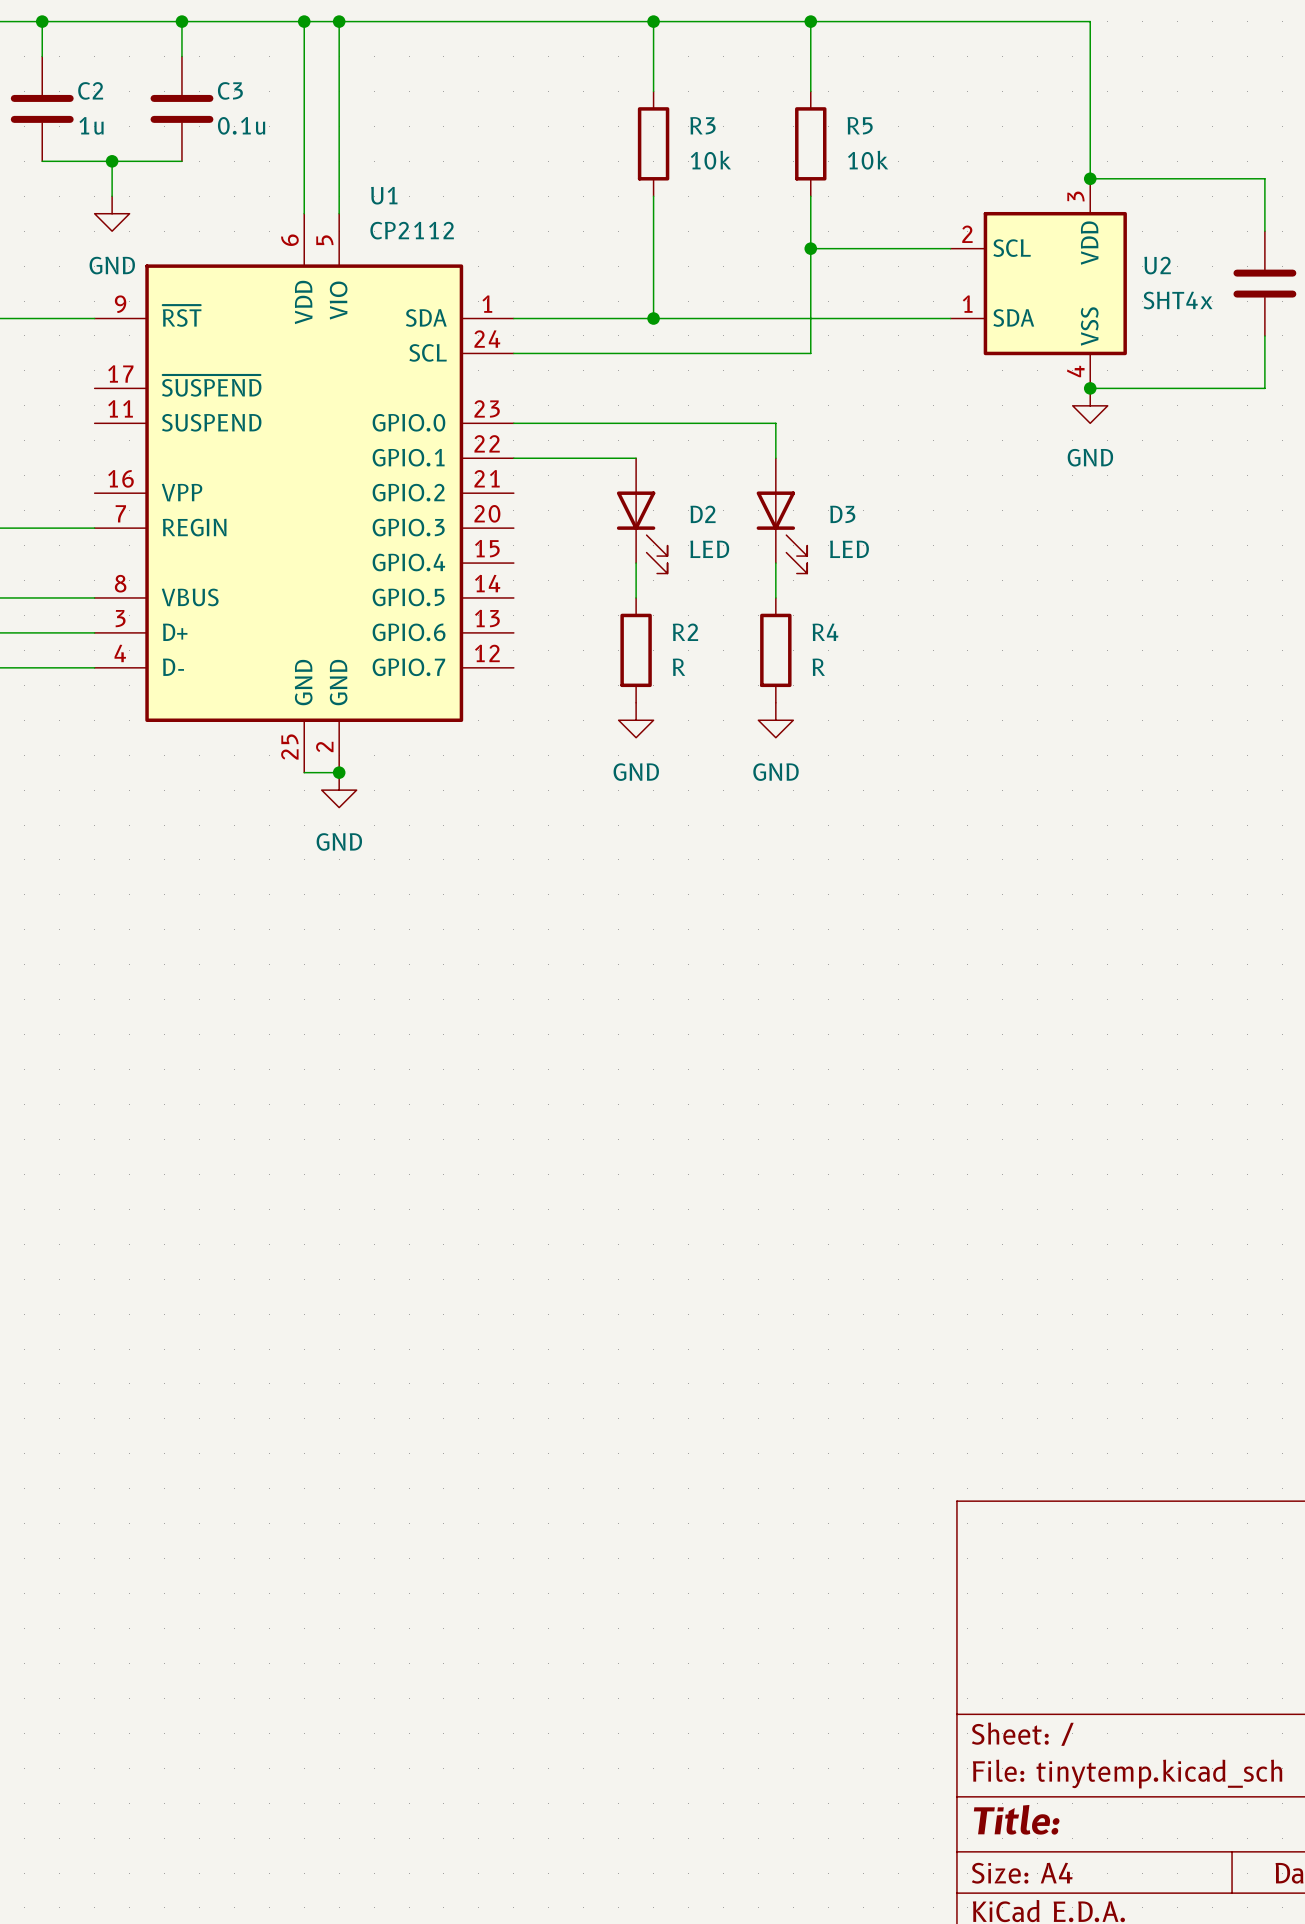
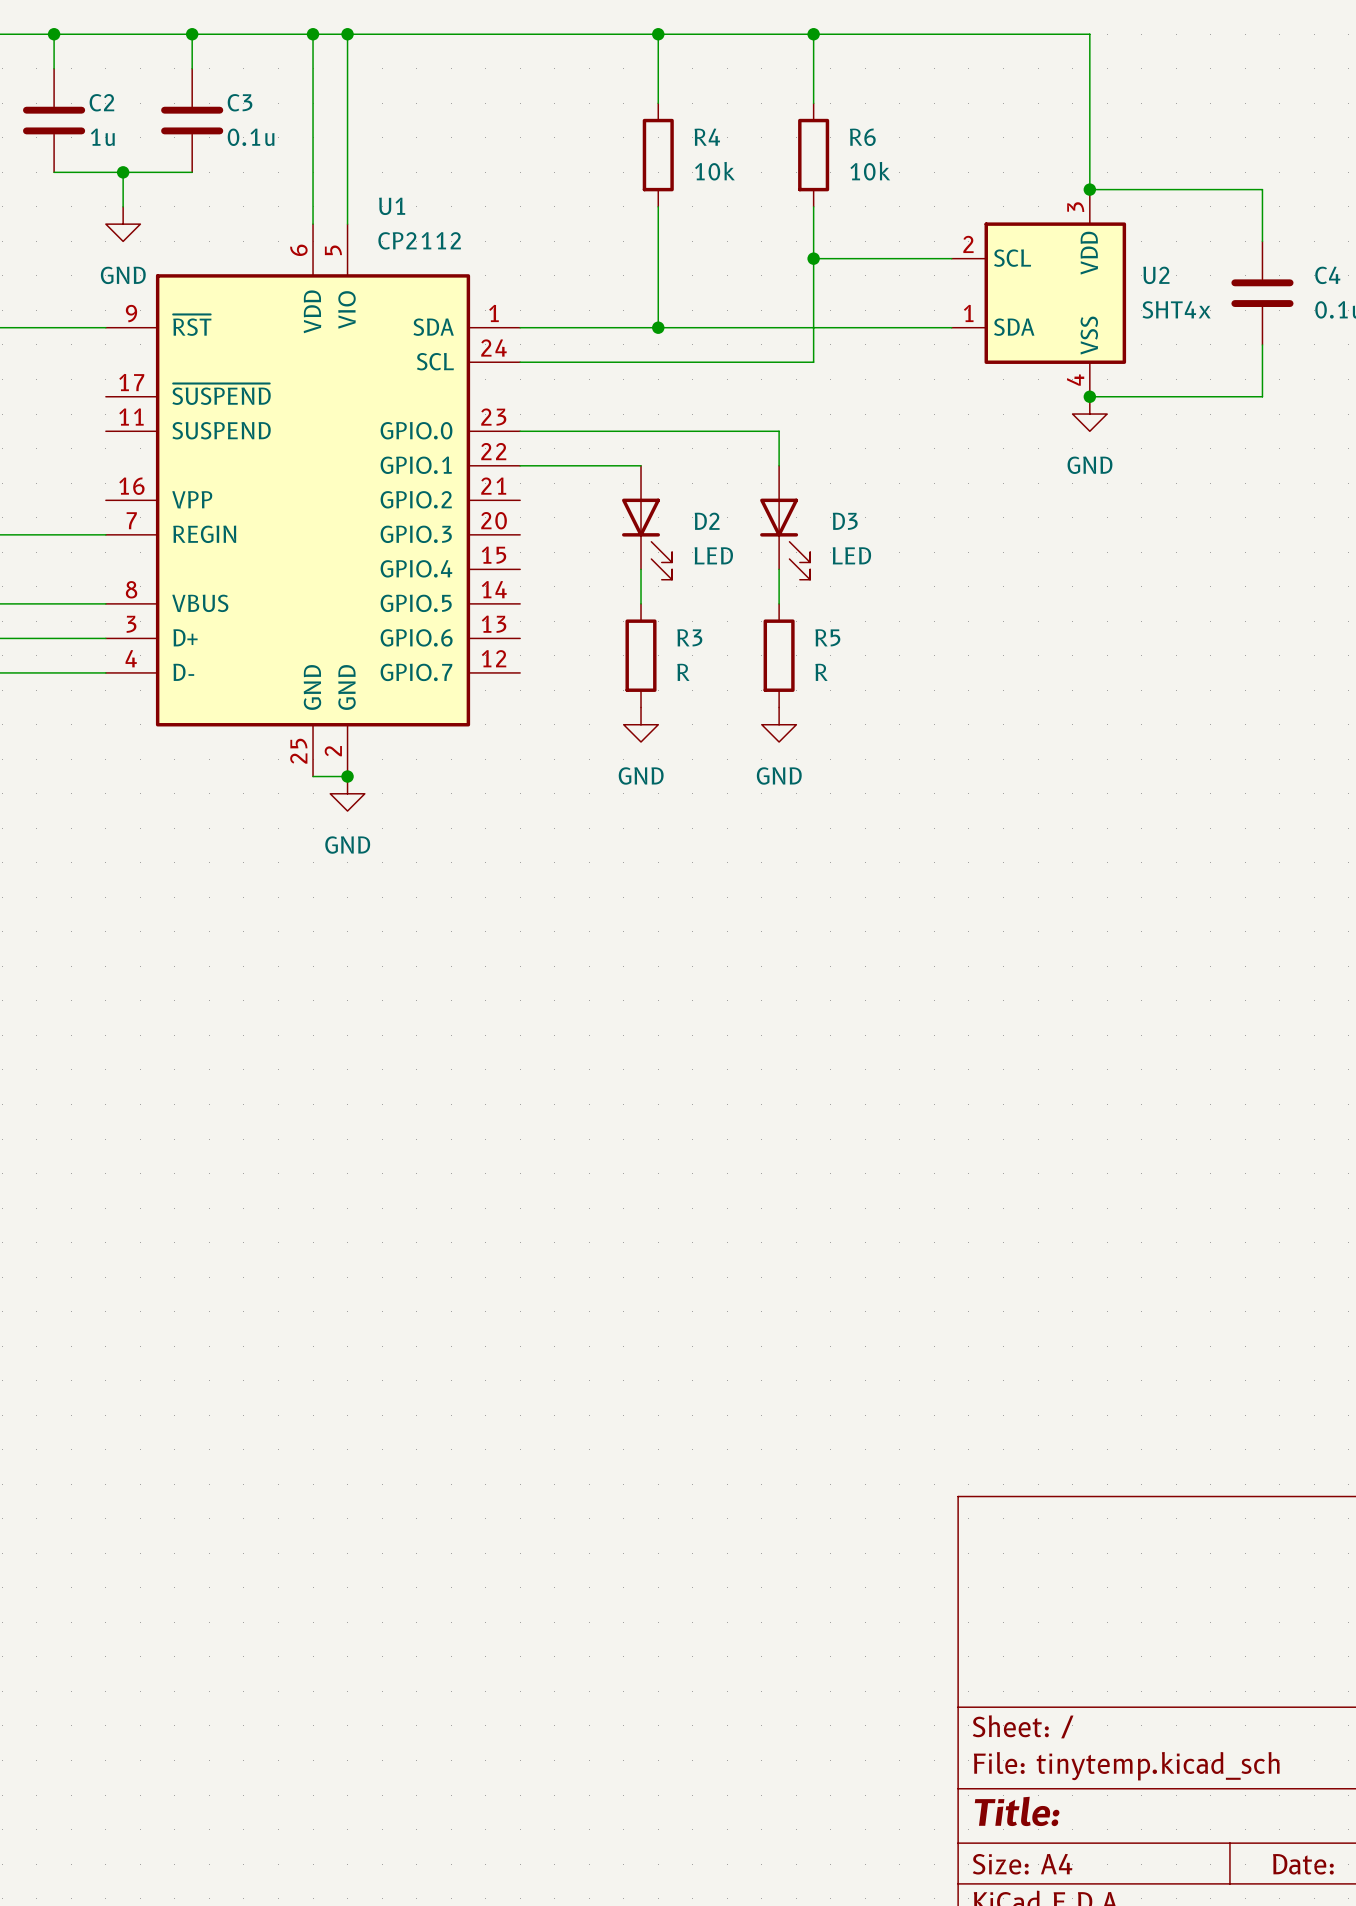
R3 name: R3 (702, 125) -> R4 (707, 137)
R5 name: R5 (860, 125) -> R6 (862, 137)
R2 name: R2 (685, 632) -> R3 (689, 637)
R4 name: R4 (825, 632) -> R5 (827, 637)

